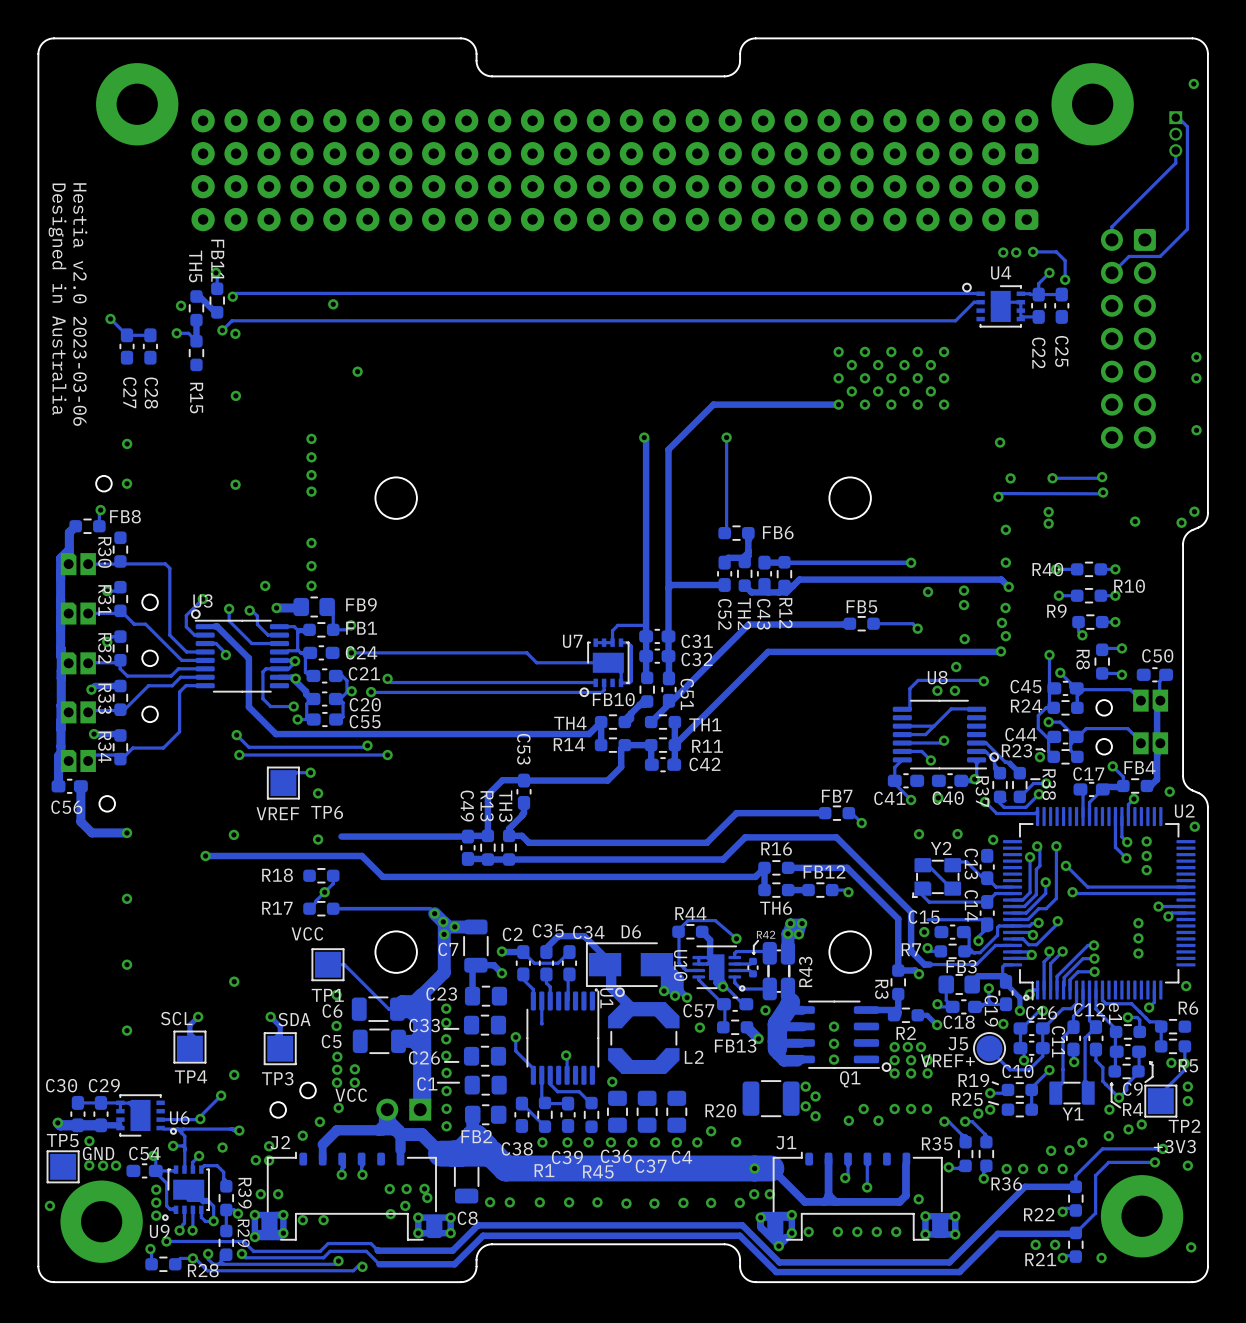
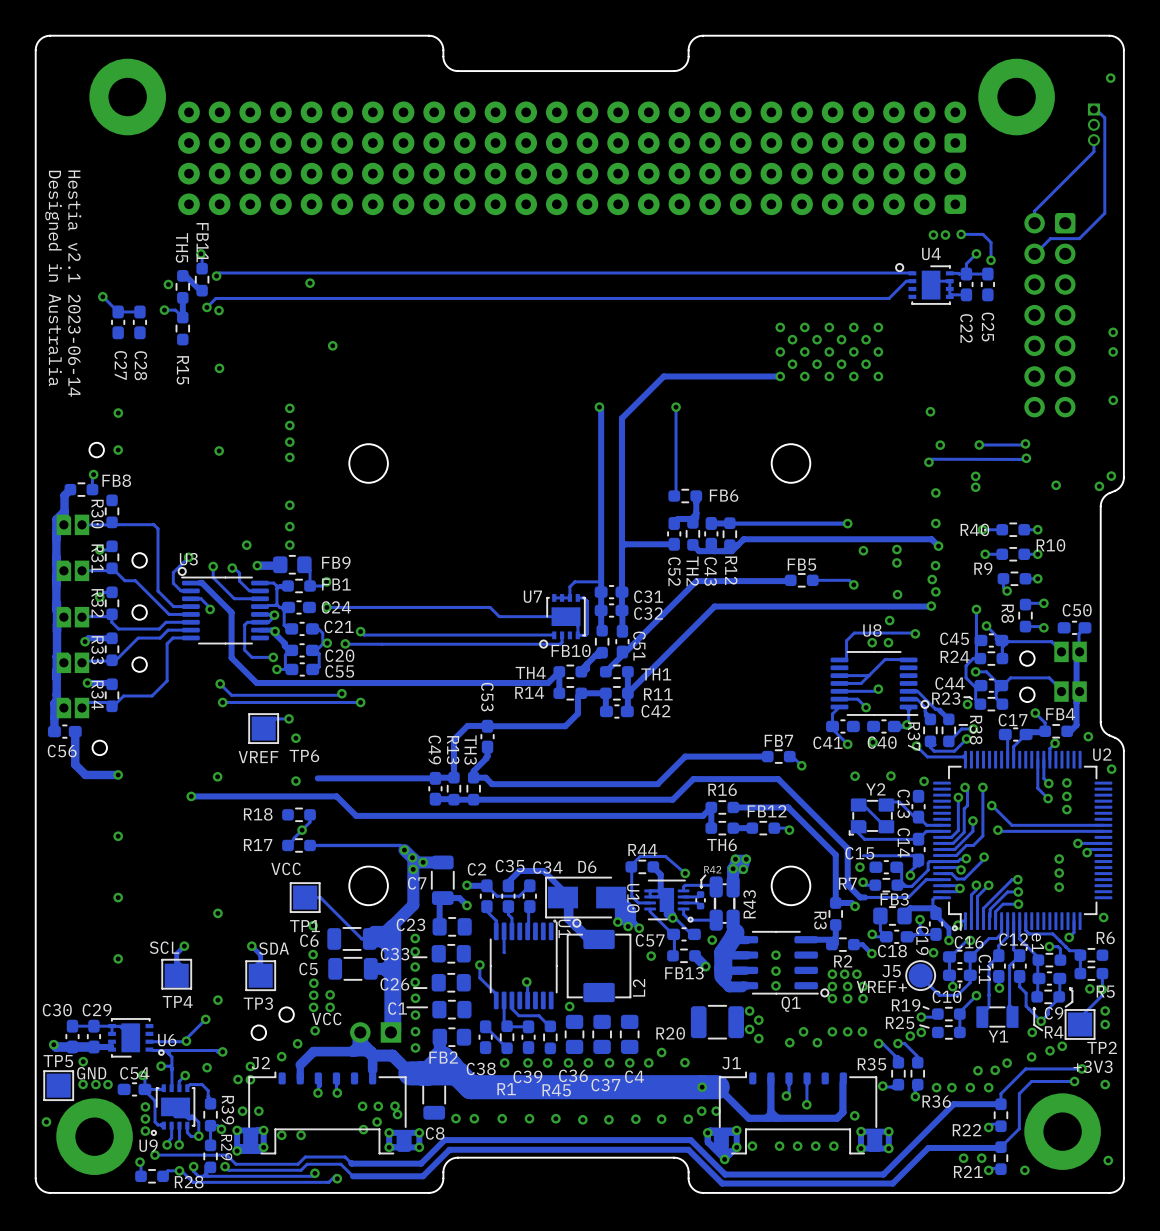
text: Hestia v2.0 2023-03-06 (80, 304) -> Hestia v2.1 2023-06-14 (74, 283)
L2 footprint: [608, 1002, 680, 1074] -> [566, 929, 632, 1003]

